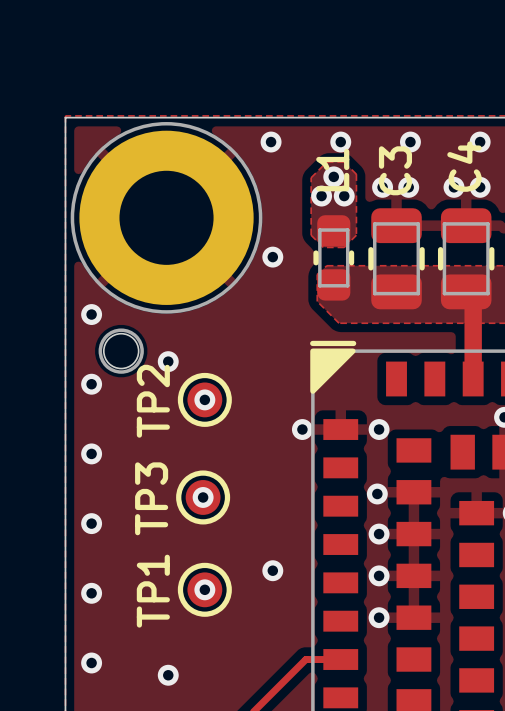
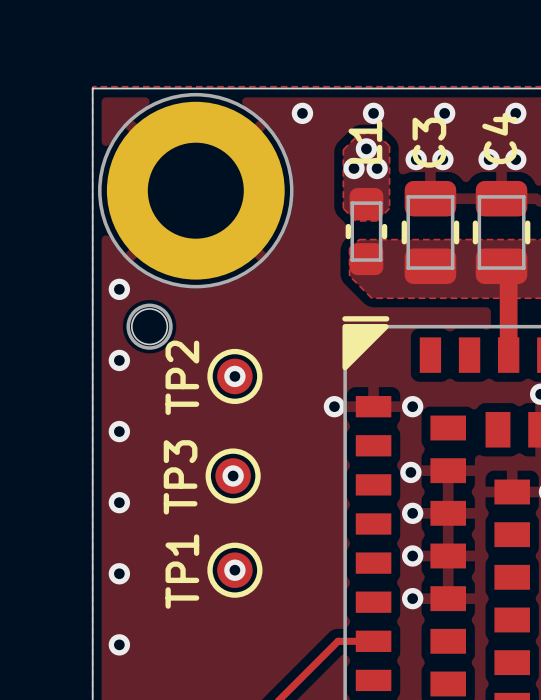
via: (272, 257) -> none
via: (168, 361) -> none
via: (272, 570) -> none
via: (168, 675) -> none

